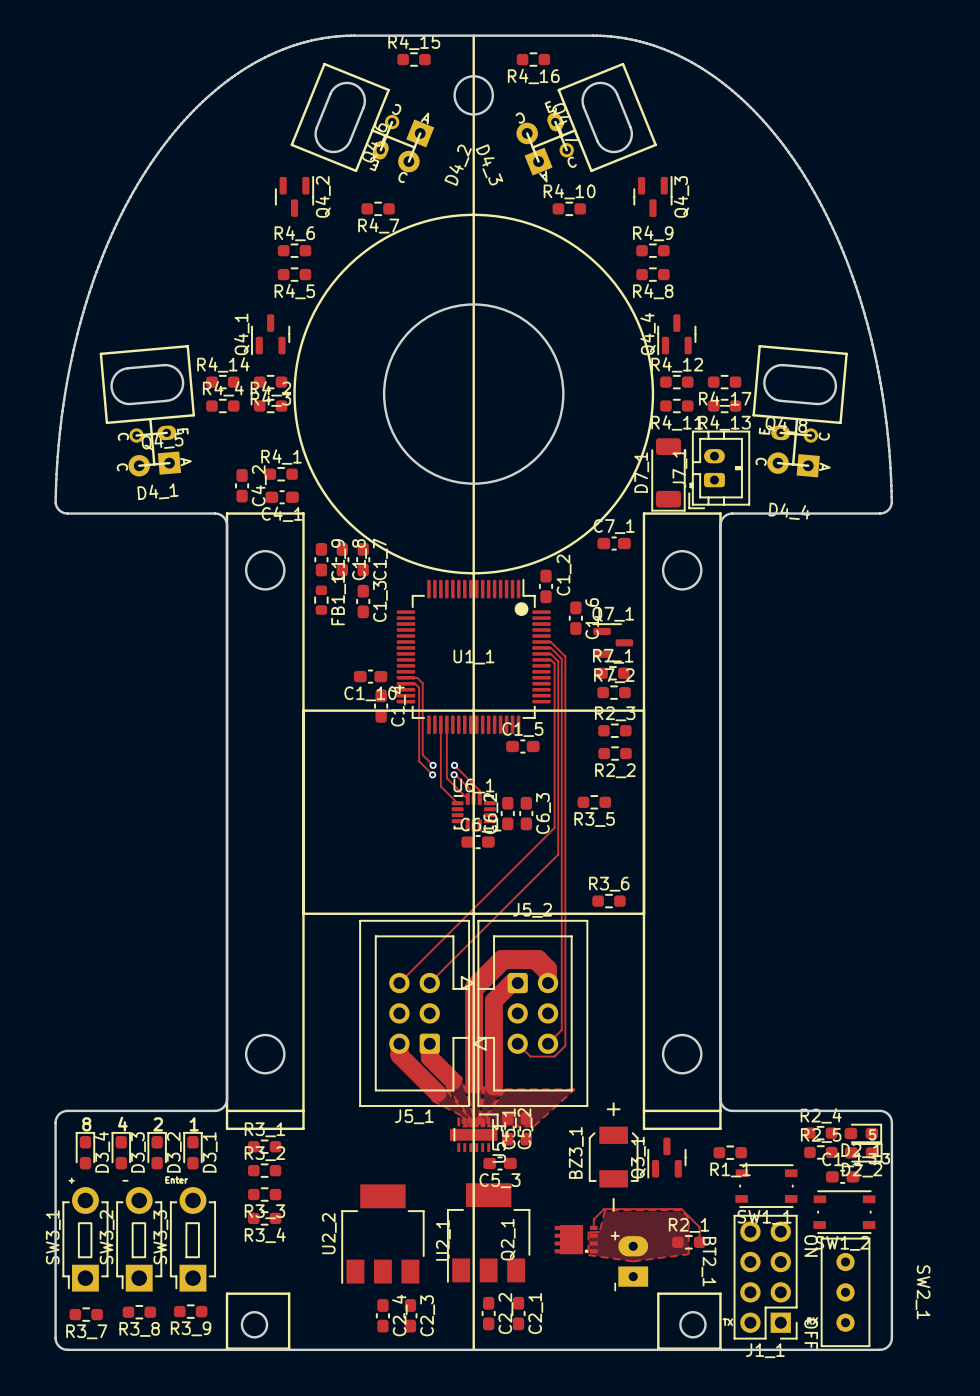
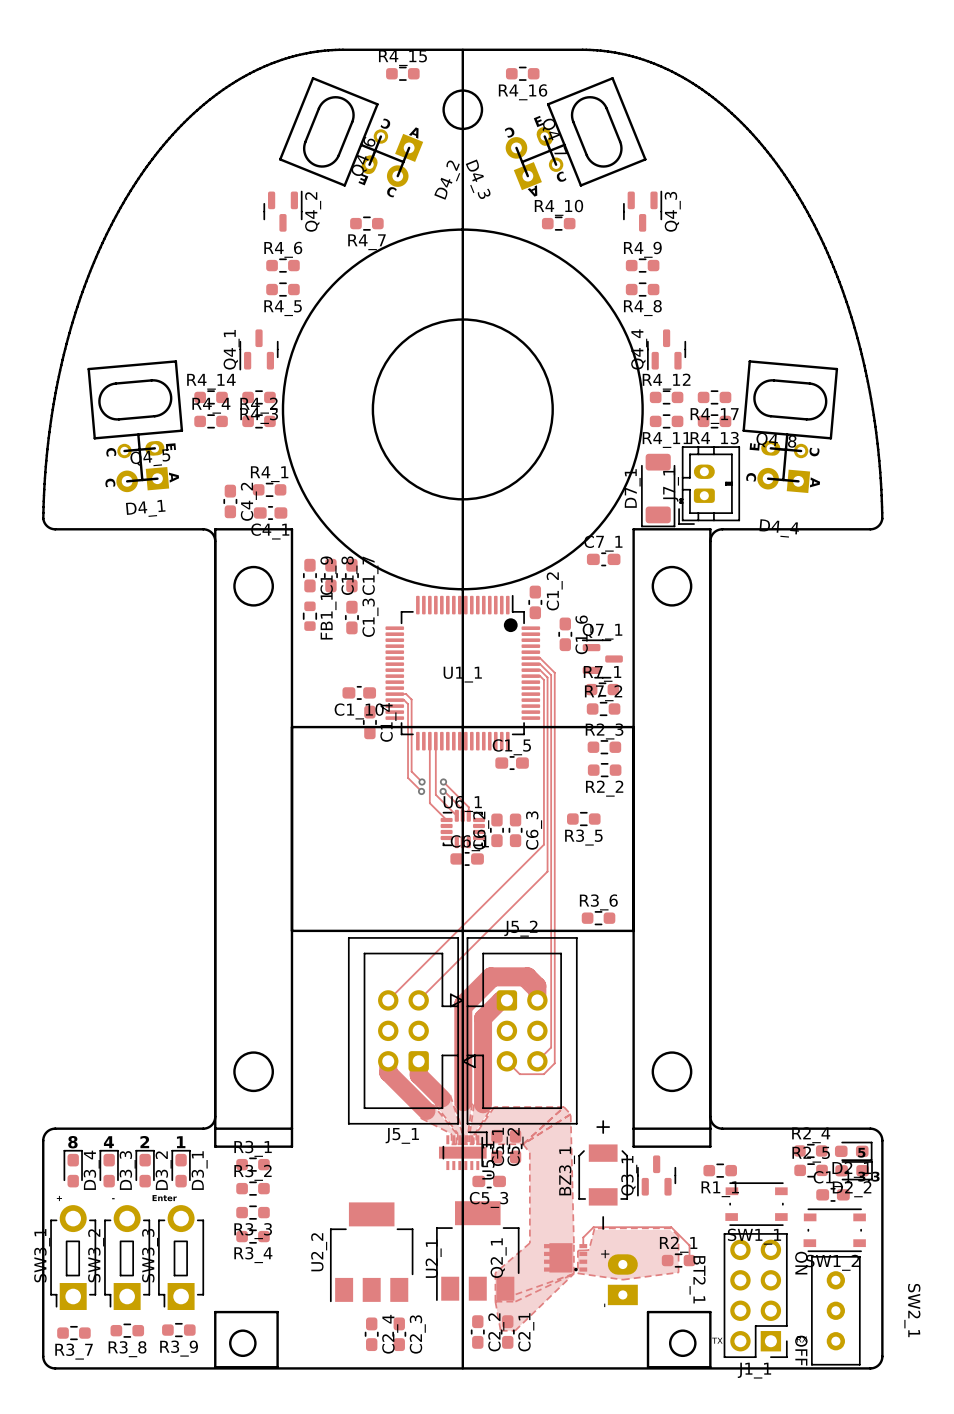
zone outline: none -> (564, 1107) (570, 1114)
zone outline: none -> (570, 1114) (573, 1273)
zone outline: none -> (570, 1114) (523, 1144) (529, 1152) (529, 1243) (495, 1272) (495, 1301)
zone outline: none -> (573, 1273) (515, 1301) (495, 1301)
zone outline: none -> (573, 1273) (515, 1330) (500, 1330) (495, 1301)
zone outline: none -> (573, 1273) (495, 1301)

